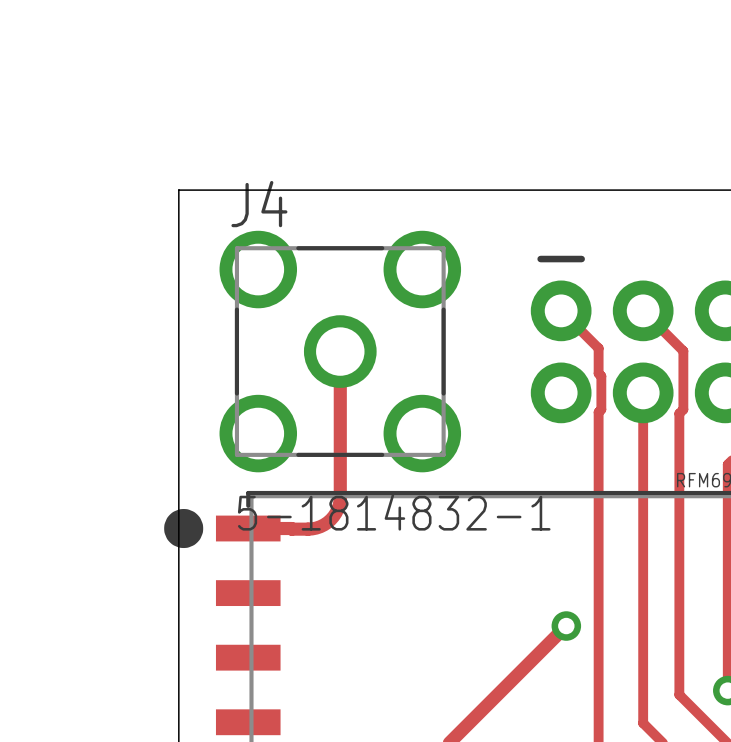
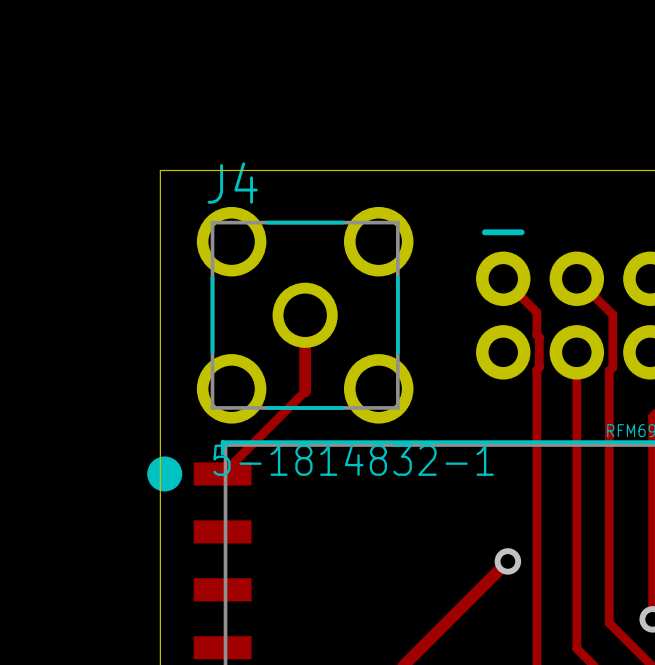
track: (340, 436) (340, 501) (337, 509) (330, 519) (320, 526) (312, 528) (248, 528) -> (305, 391) (222, 473)

